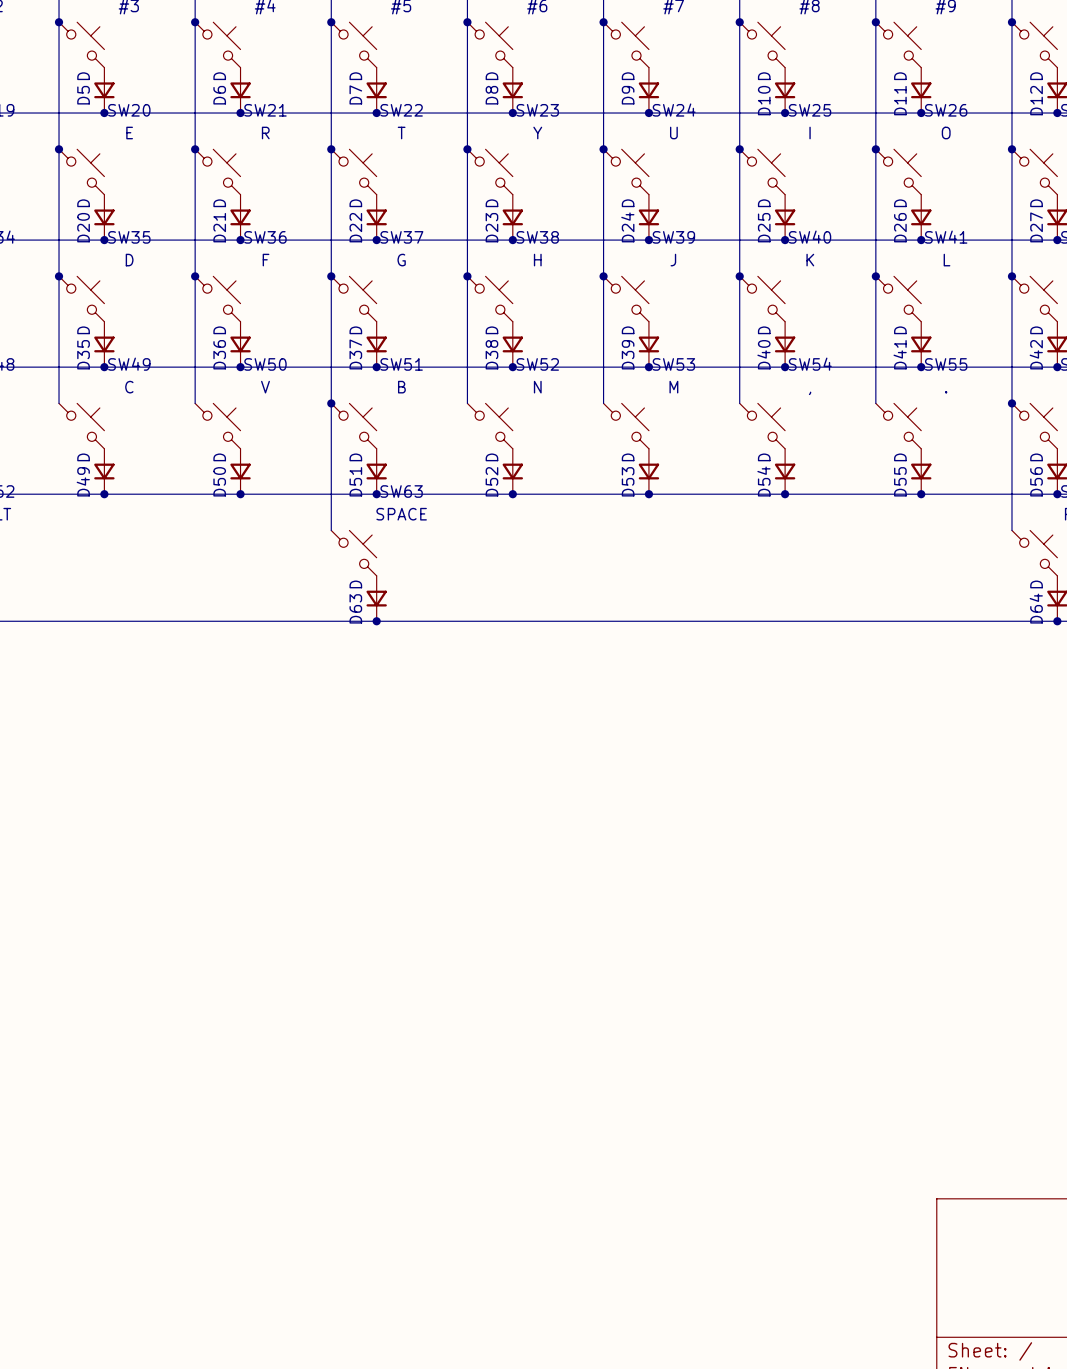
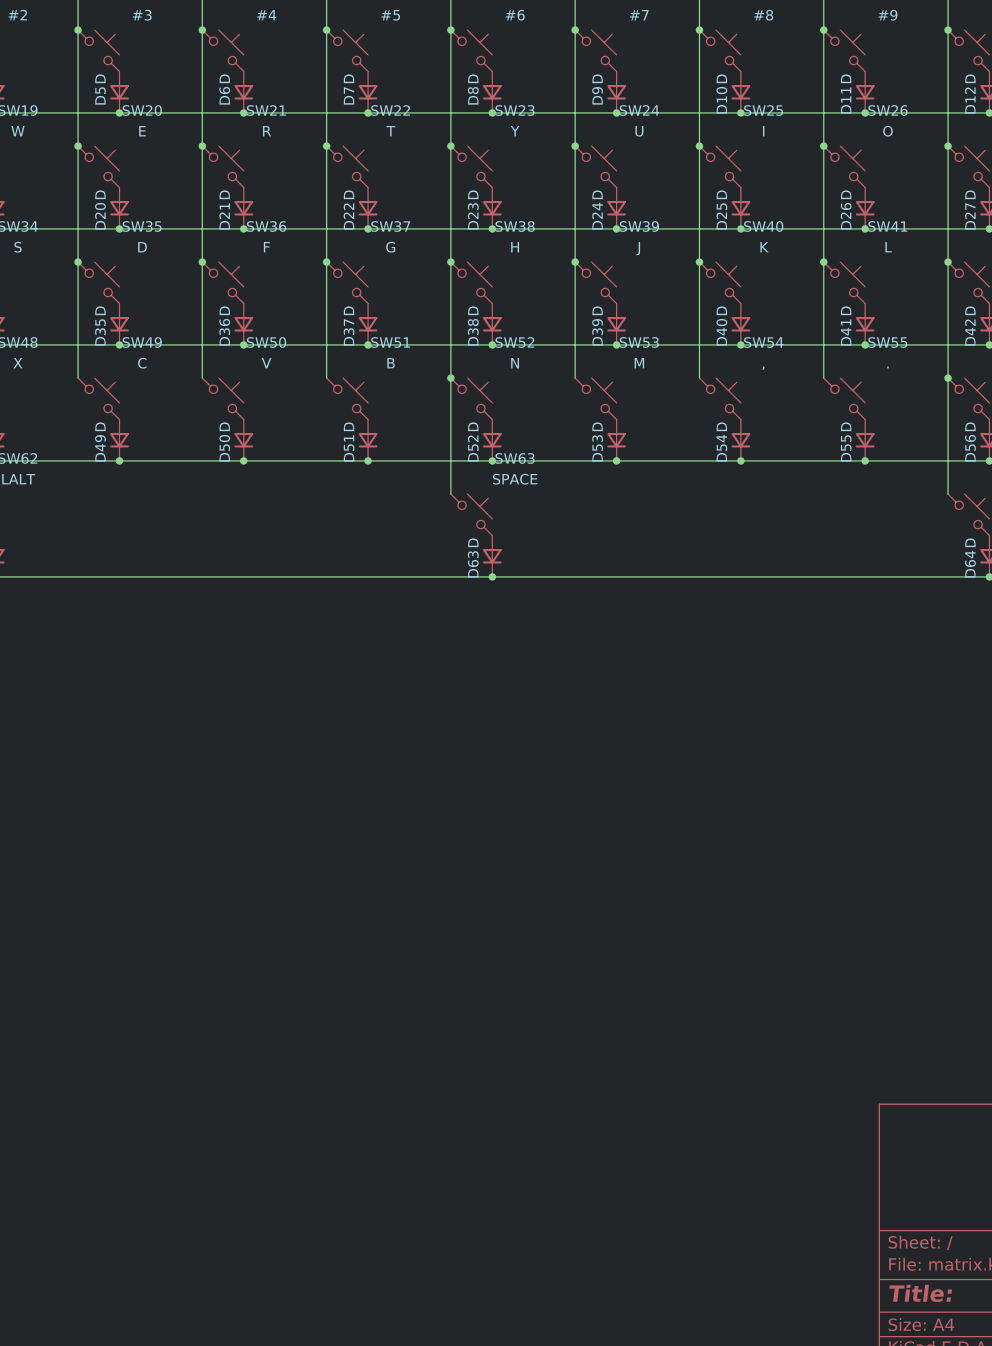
wire: (331, 403) (331, 530) -> (450, 378) (450, 494)
junction: (331, 403) -> none
junction: none -> (450, 378)
SW63 position: (353, 553) -> (471, 514)
D63 position: (376, 598) -> (492, 556)
junction: (376, 621) -> none
junction: none -> (492, 576)

